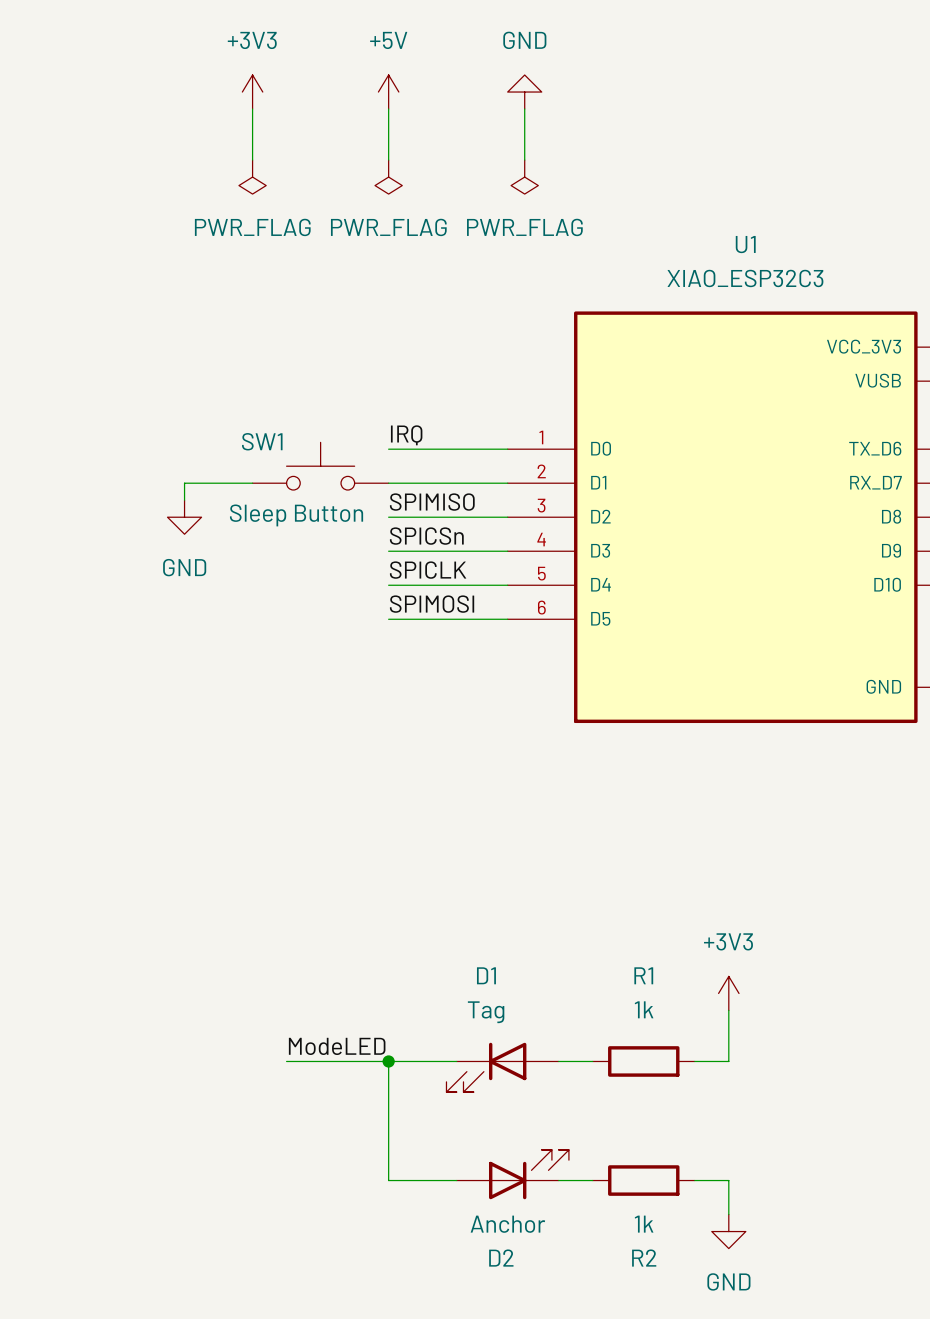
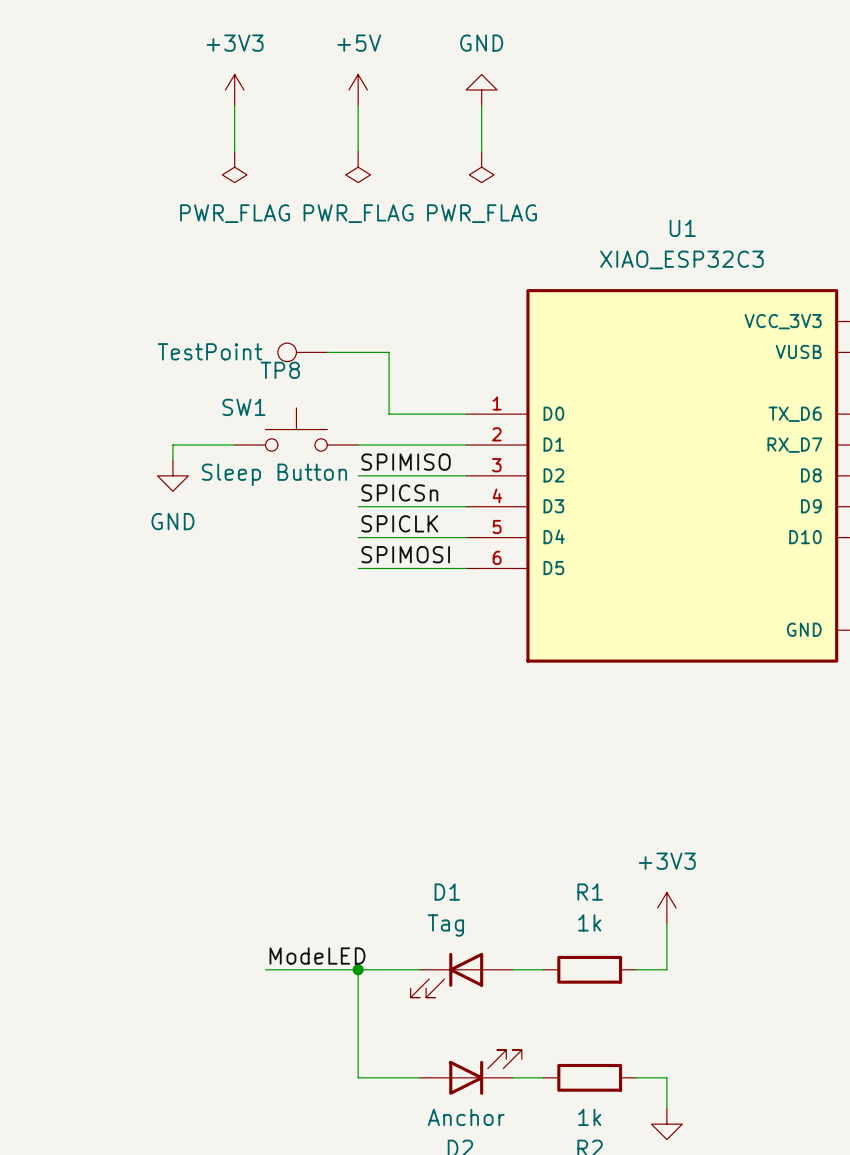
TP8: none -> TestPoint (302, 352)
label: IRQ (406, 435) -> none
wire: (388, 449) (422, 449) -> (327, 352) (389, 352) (389, 414)

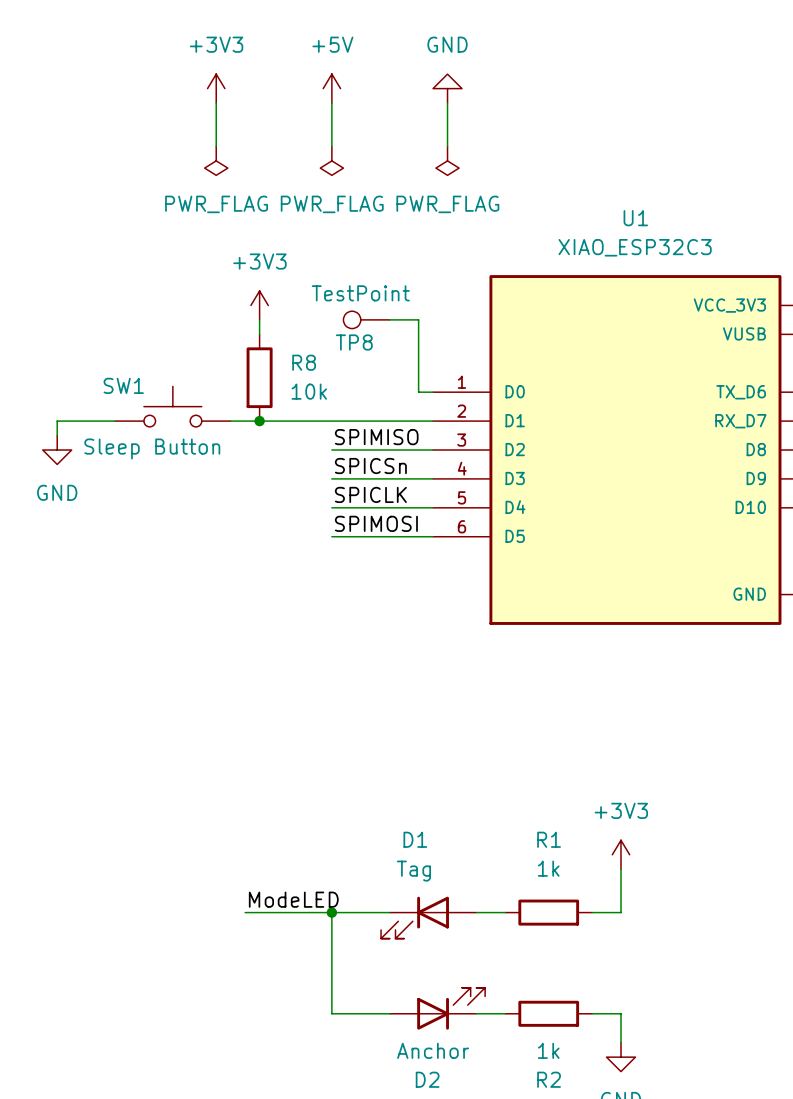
power symbol: none -> +3V3 (259, 305)
wire: none -> (259, 319) (259, 334)
TP8 value position: TestPoint (209, 351) -> TestPoint (360, 293)
TP8 position: (302, 352) -> (366, 319)
wire: (327, 352) (389, 352) (389, 414) (450, 414) -> (389, 319) (418, 319) (418, 392)
TP8 name position: TP8 (280, 370) -> TP8 (354, 342)
R8: none -> 10k (259, 377)
SW1 position: (296, 429) -> (172, 406)
wire: (234, 445) (172, 445) (172, 460) -> (115, 421) (57, 421) (57, 435)
wire: none -> (230, 421) (331, 421)
junction: none -> (259, 421)
power symbol position: GND (172, 475) -> GND (57, 450)

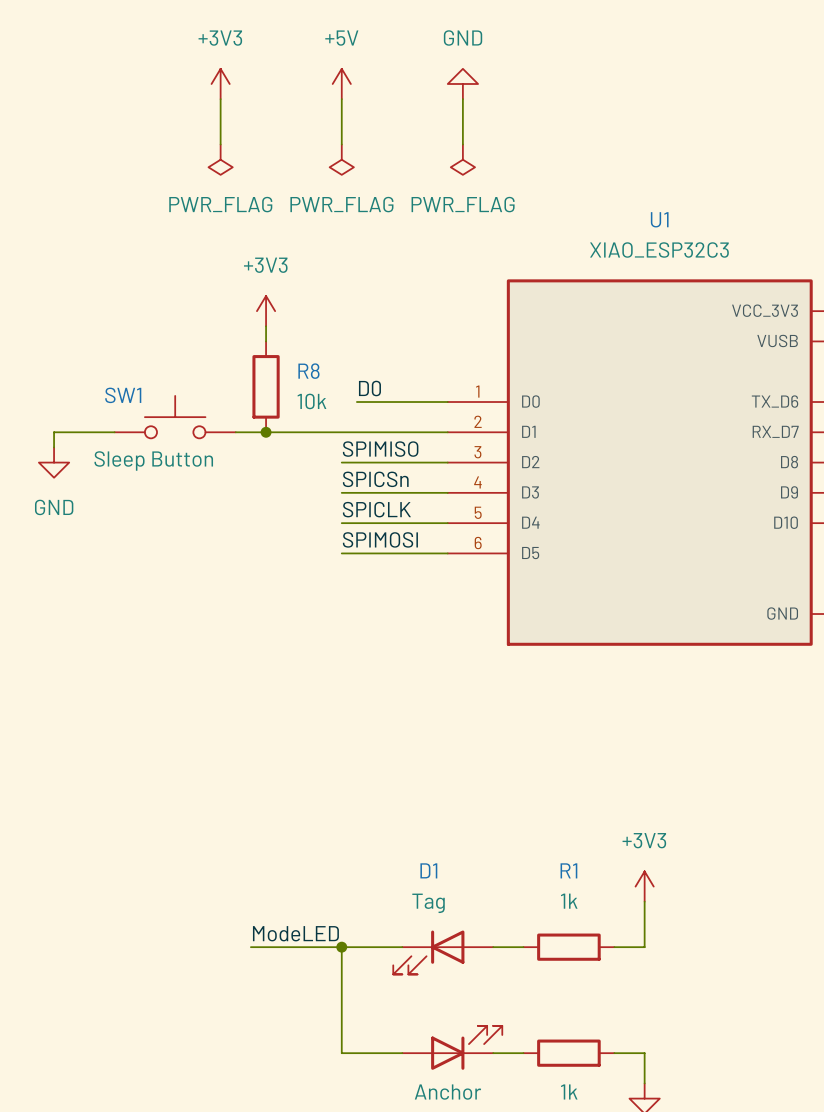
TP8: TestPoint (366, 319) -> none
wire: (389, 319) (418, 319) (418, 392) -> (356, 402) (432, 402)
label: none -> D0 (369, 388)

